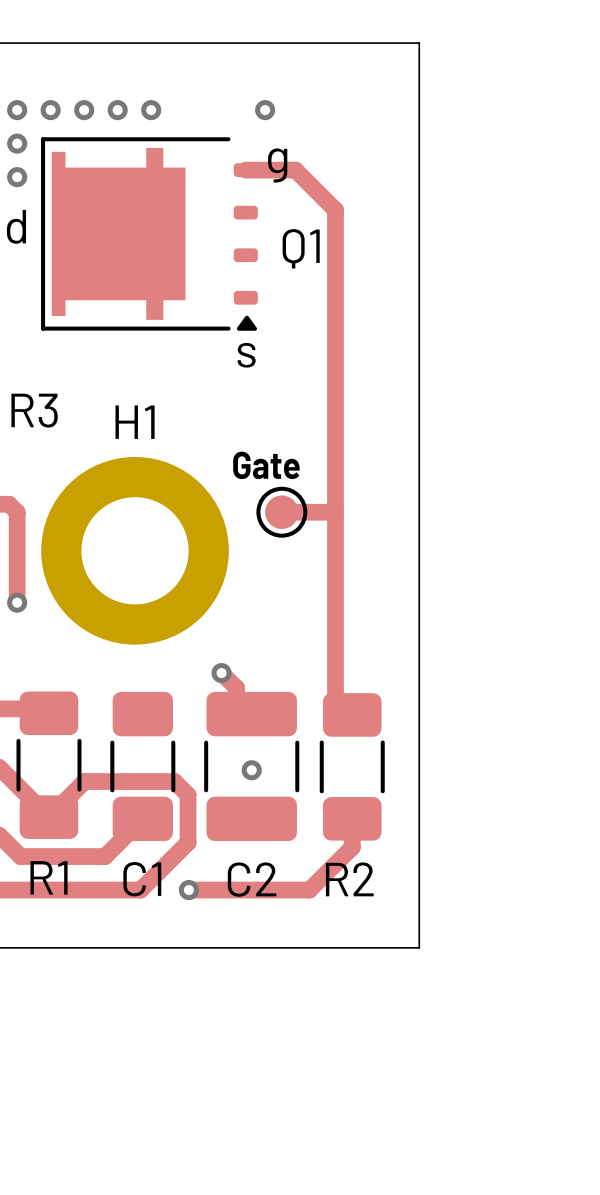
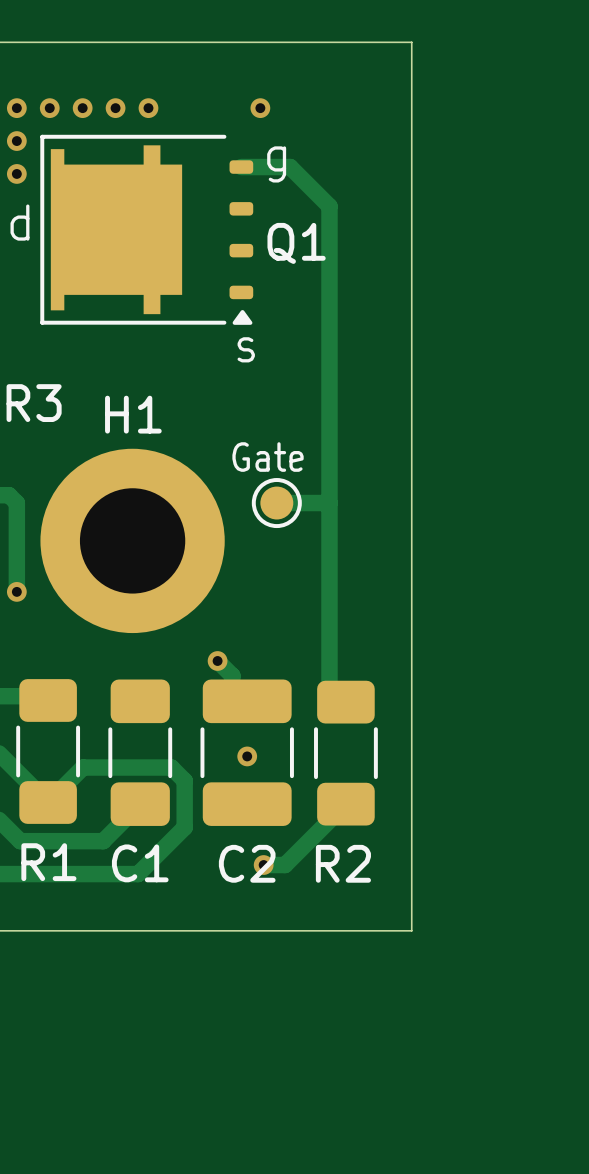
track: (352, 818) (352, 847) (309, 890) (188, 890) -> (345, 804) (285, 865) (263, 865)
via position: (188, 890) -> (263, 865)

